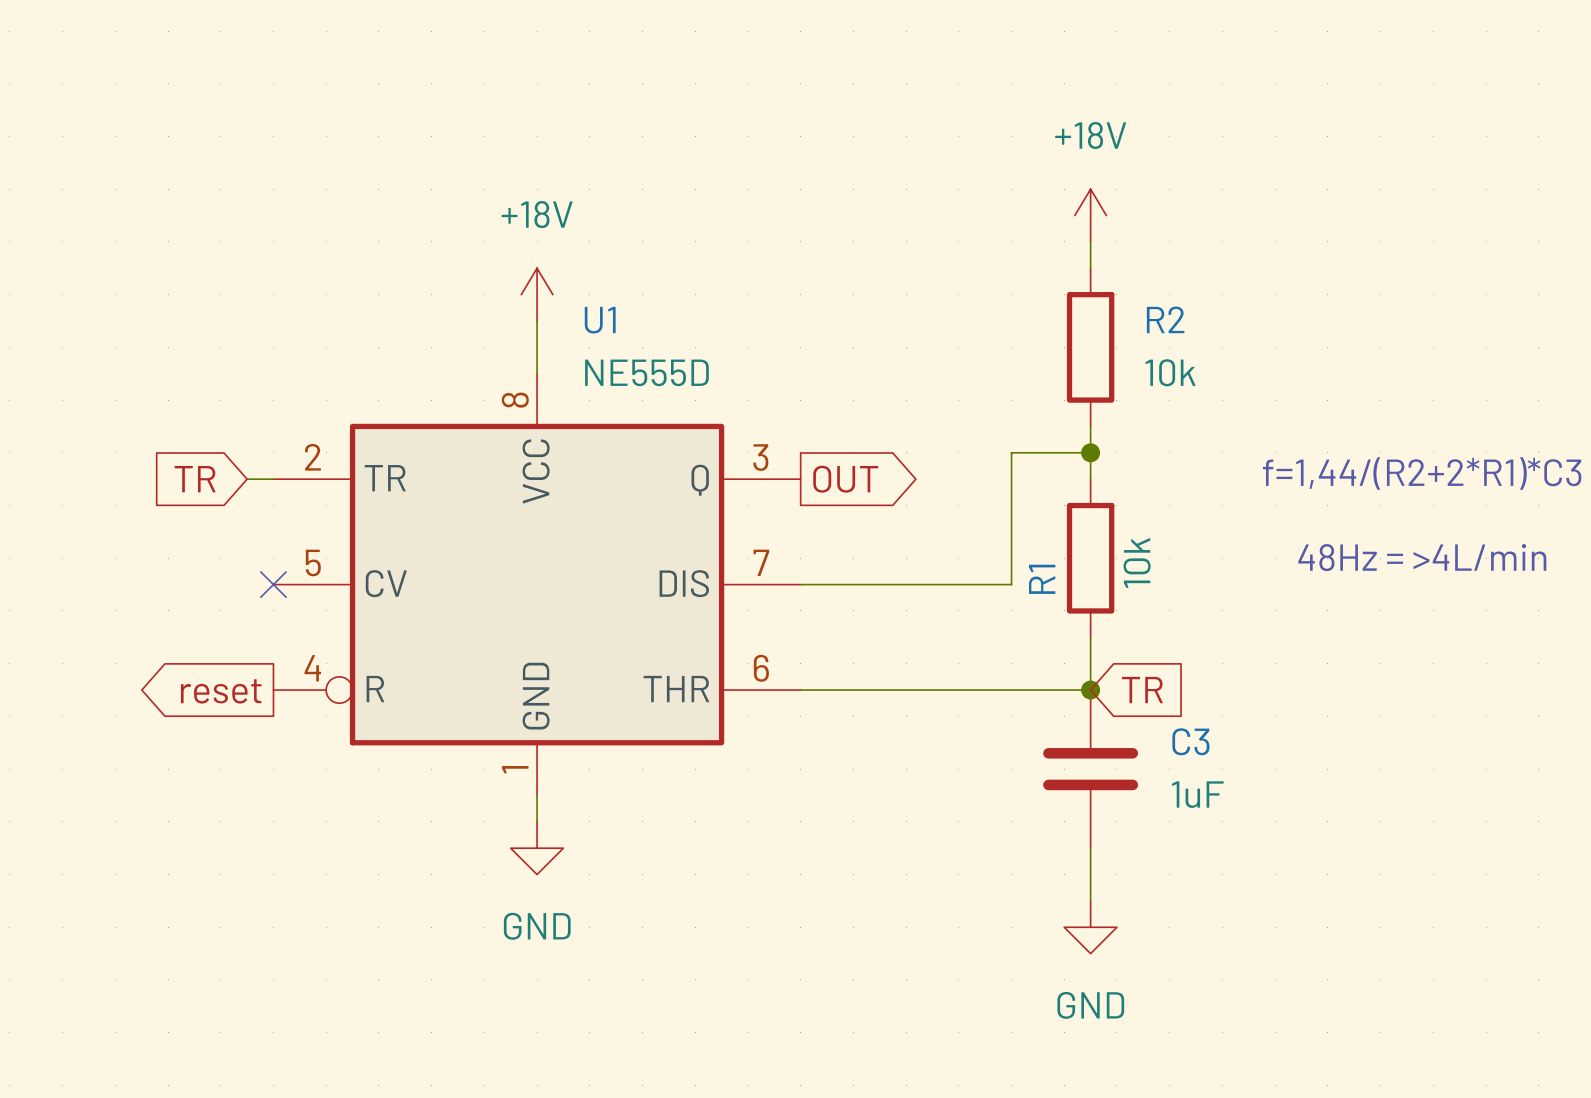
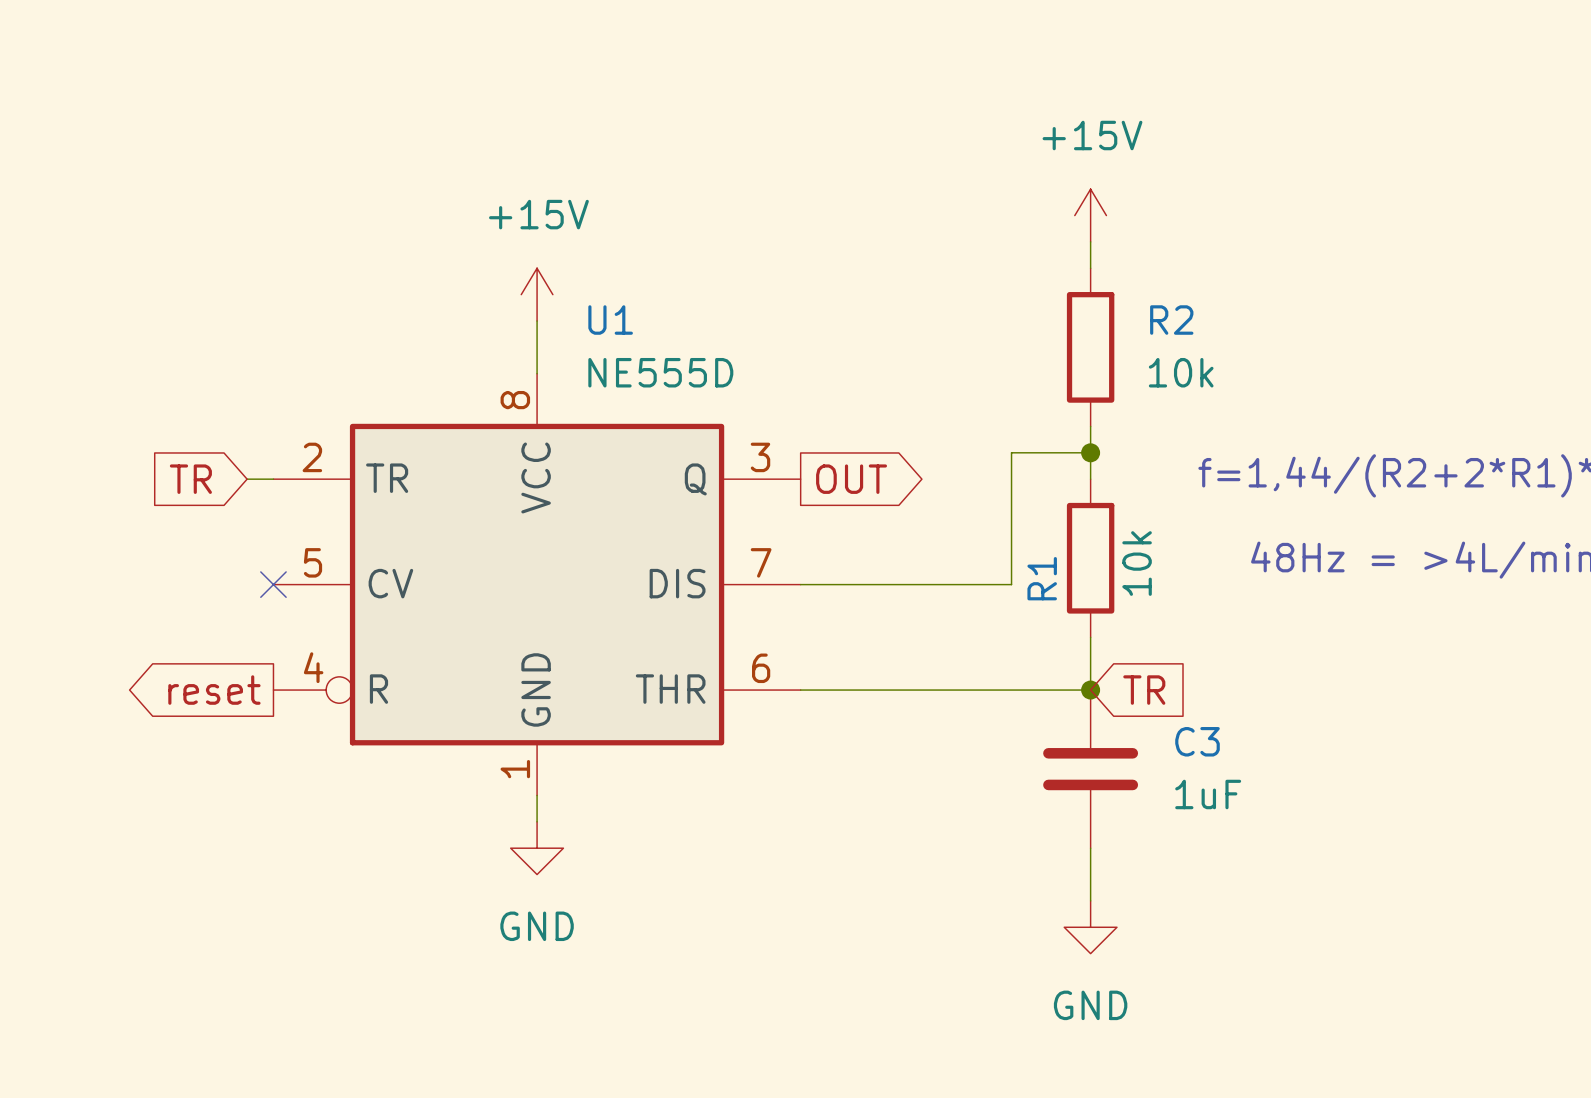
power symbol: +18V (1090, 215) -> +15V (1090, 215)
power symbol: +18V (537, 294) -> +15V (537, 294)

